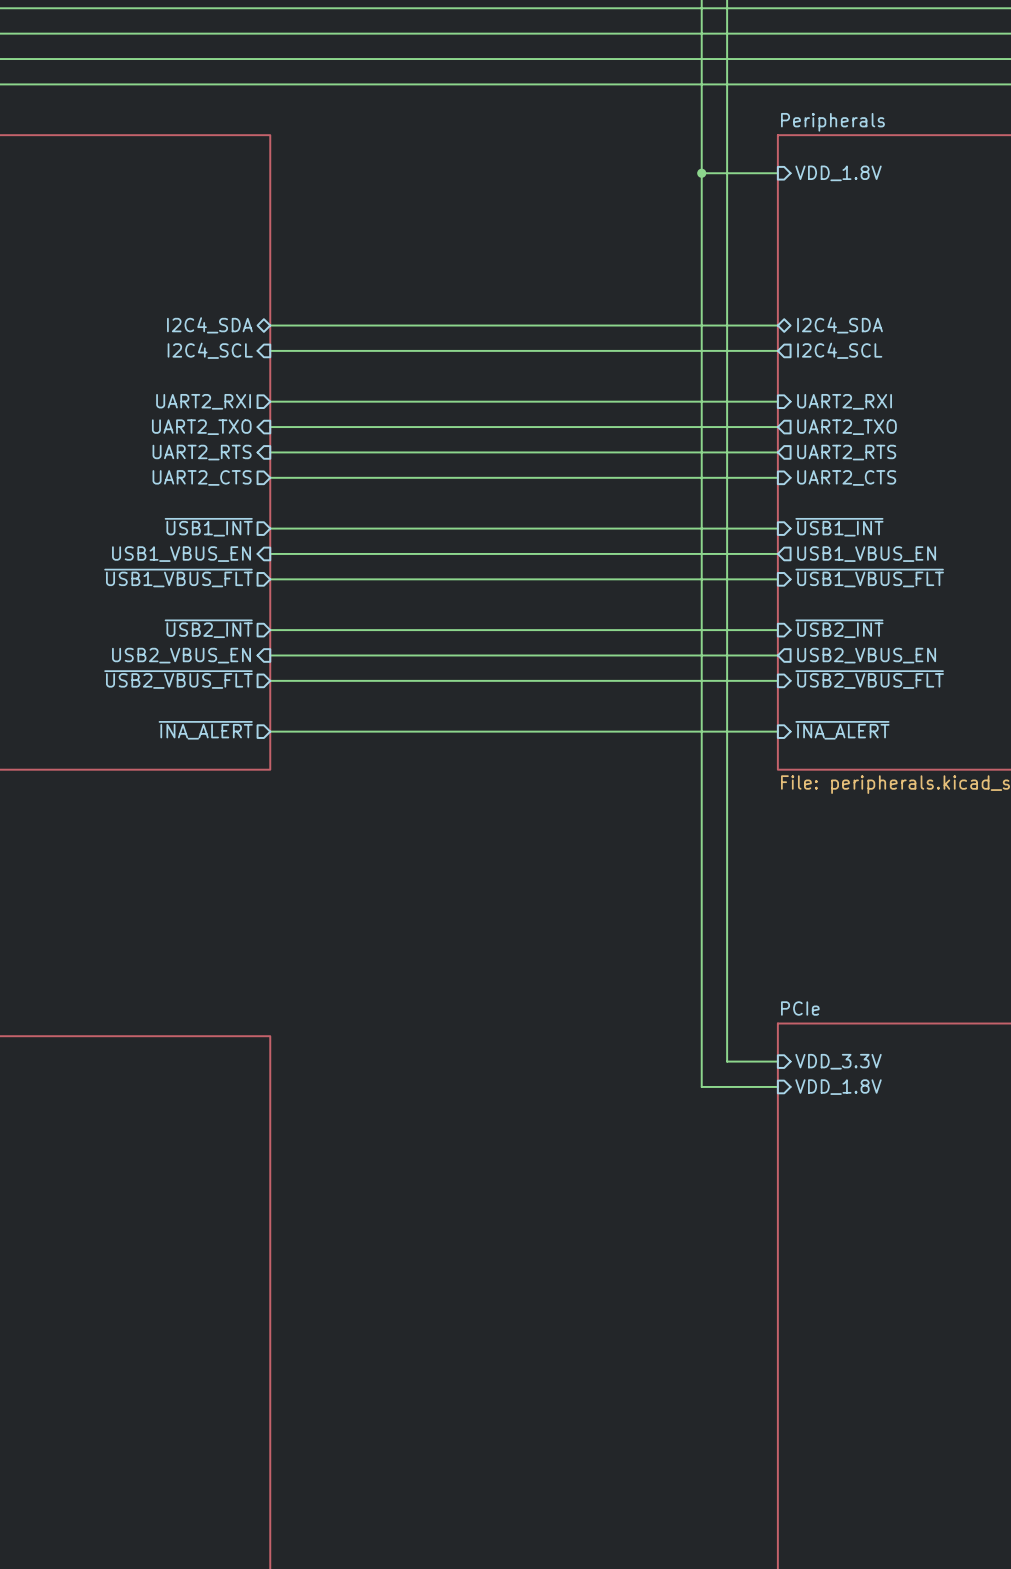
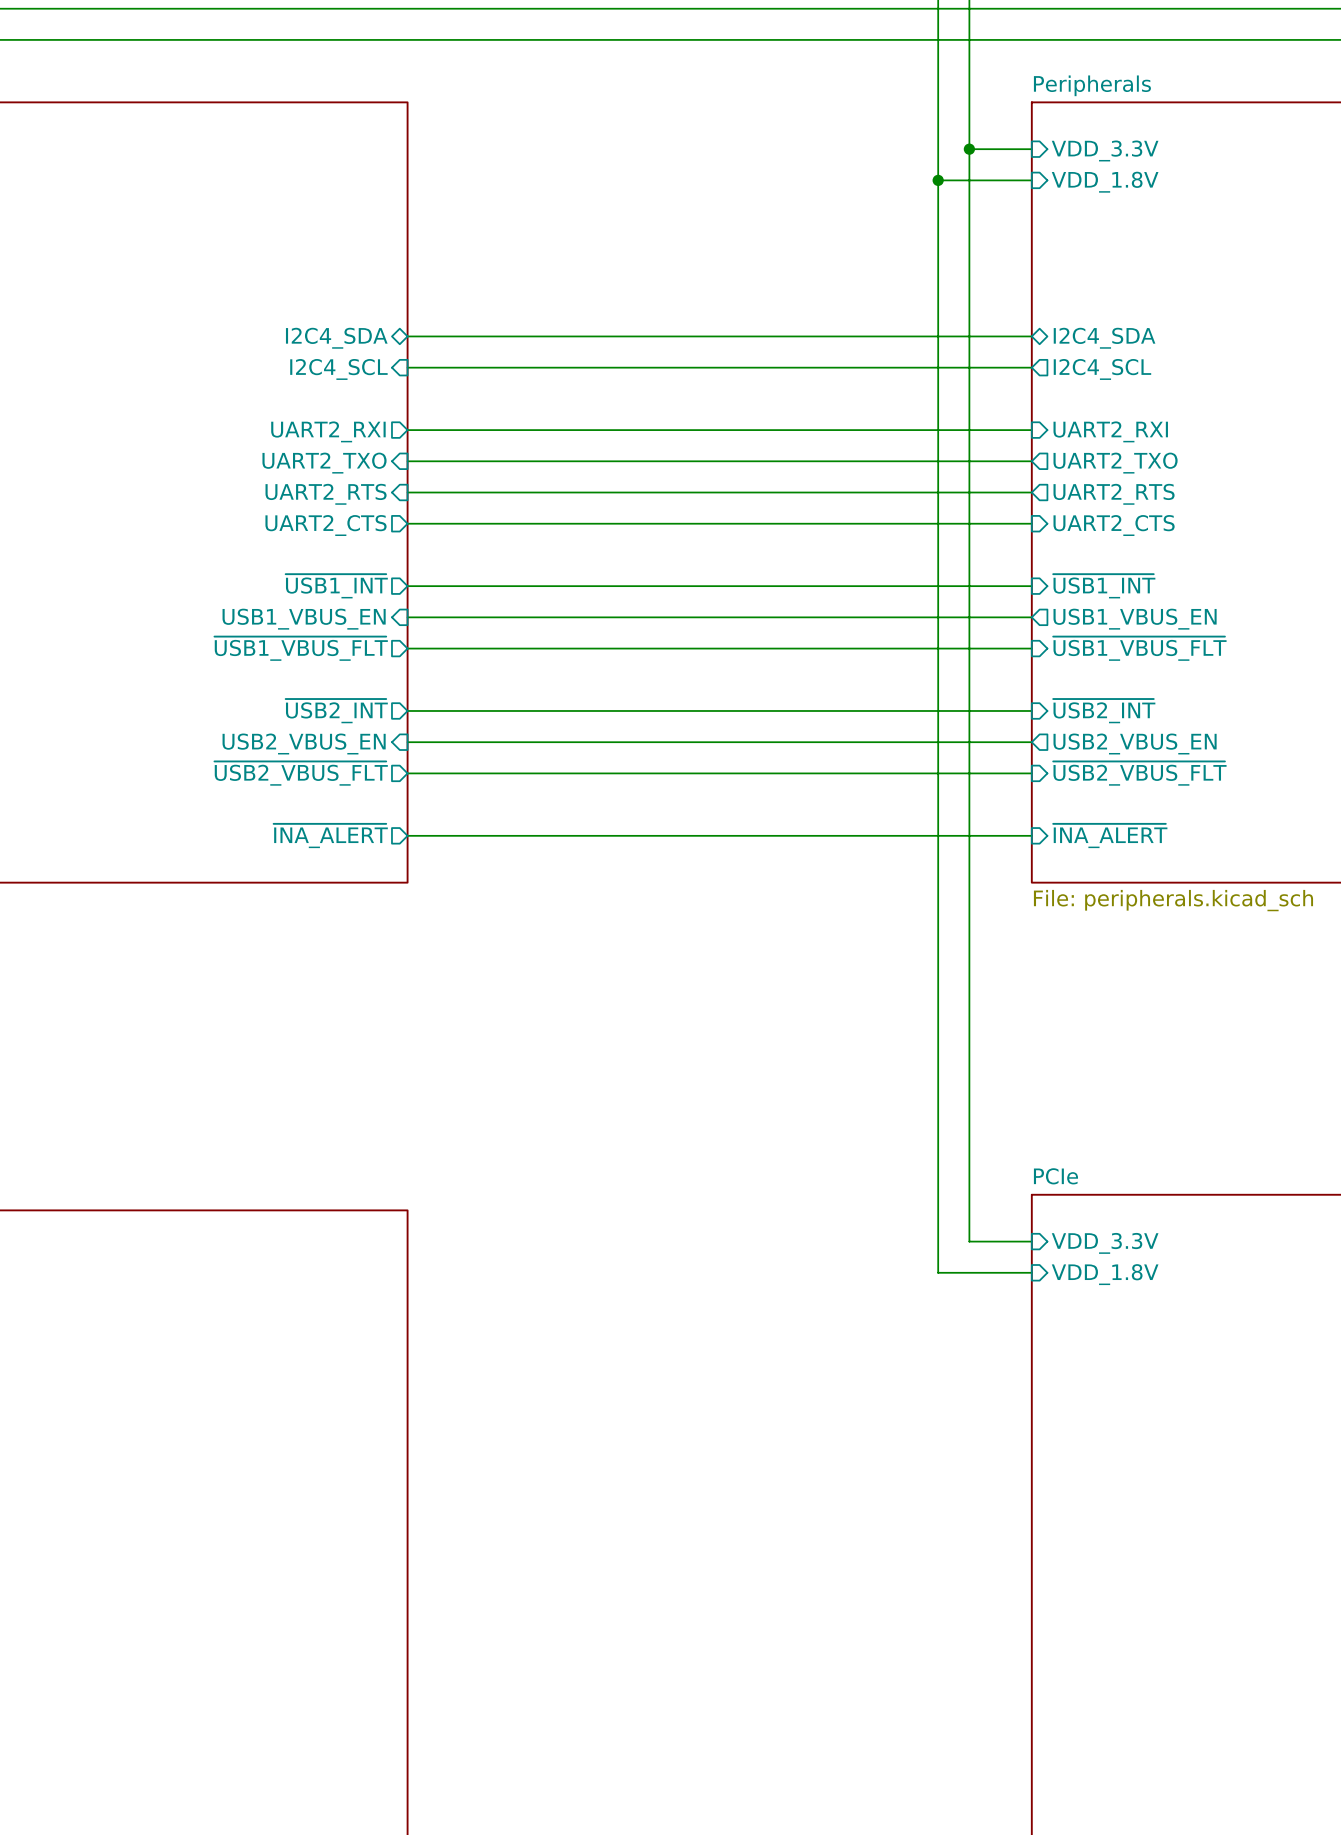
wire: (701, 173) (727, 173) -> none
junction: (701, 173) -> none
junction: none -> (969, 149)
sheet pin: VDD_1.8V (838, 173) -> VDD_3.3V (1105, 150)
wire: none -> (938, 180) (1031, 180)
junction: none -> (938, 180)
sheet pin: none -> VDD_1.8V (1105, 182)

